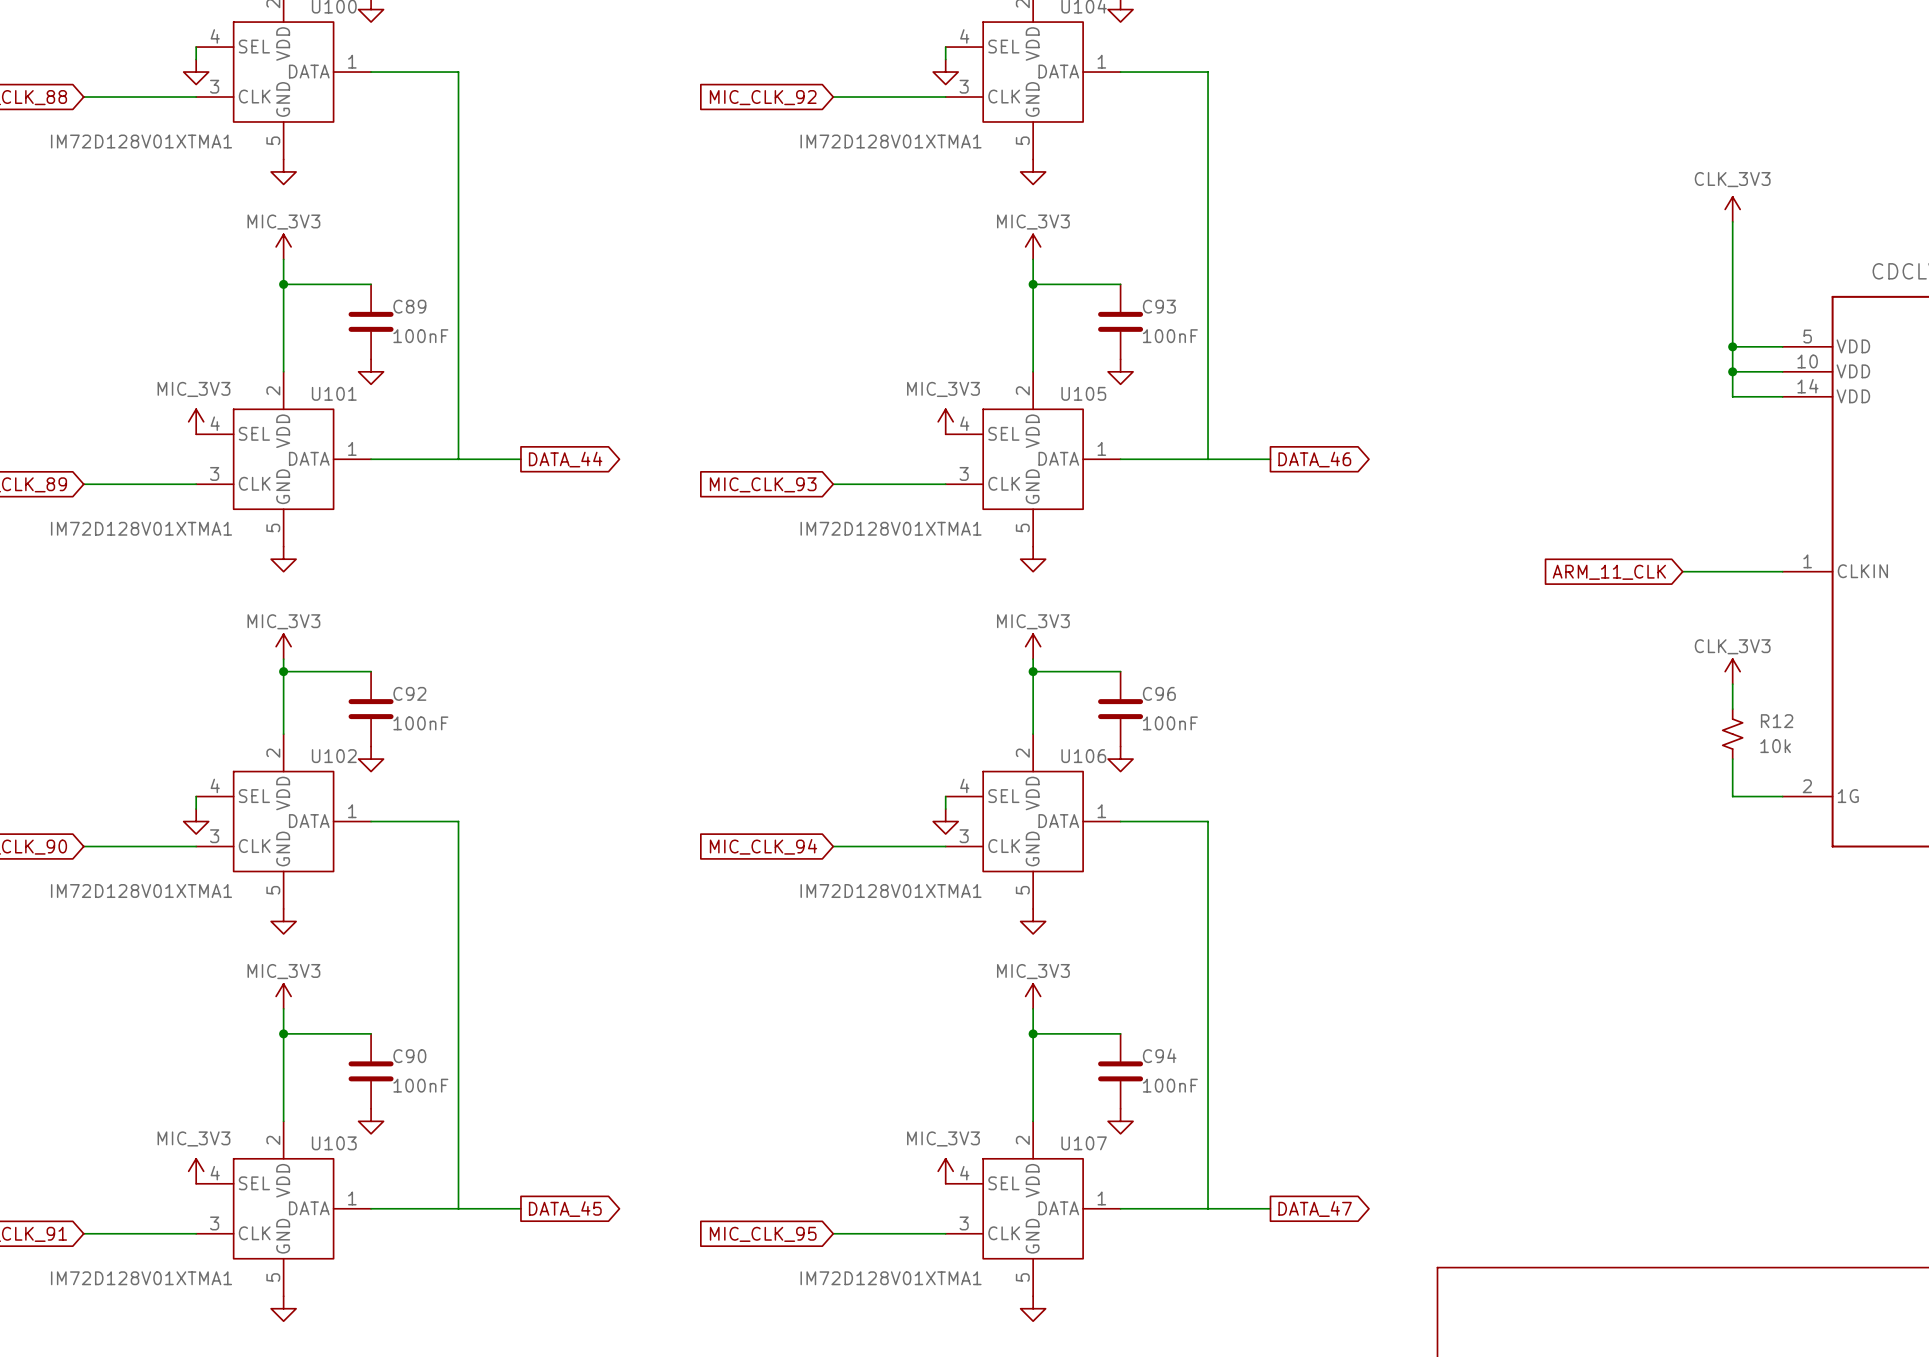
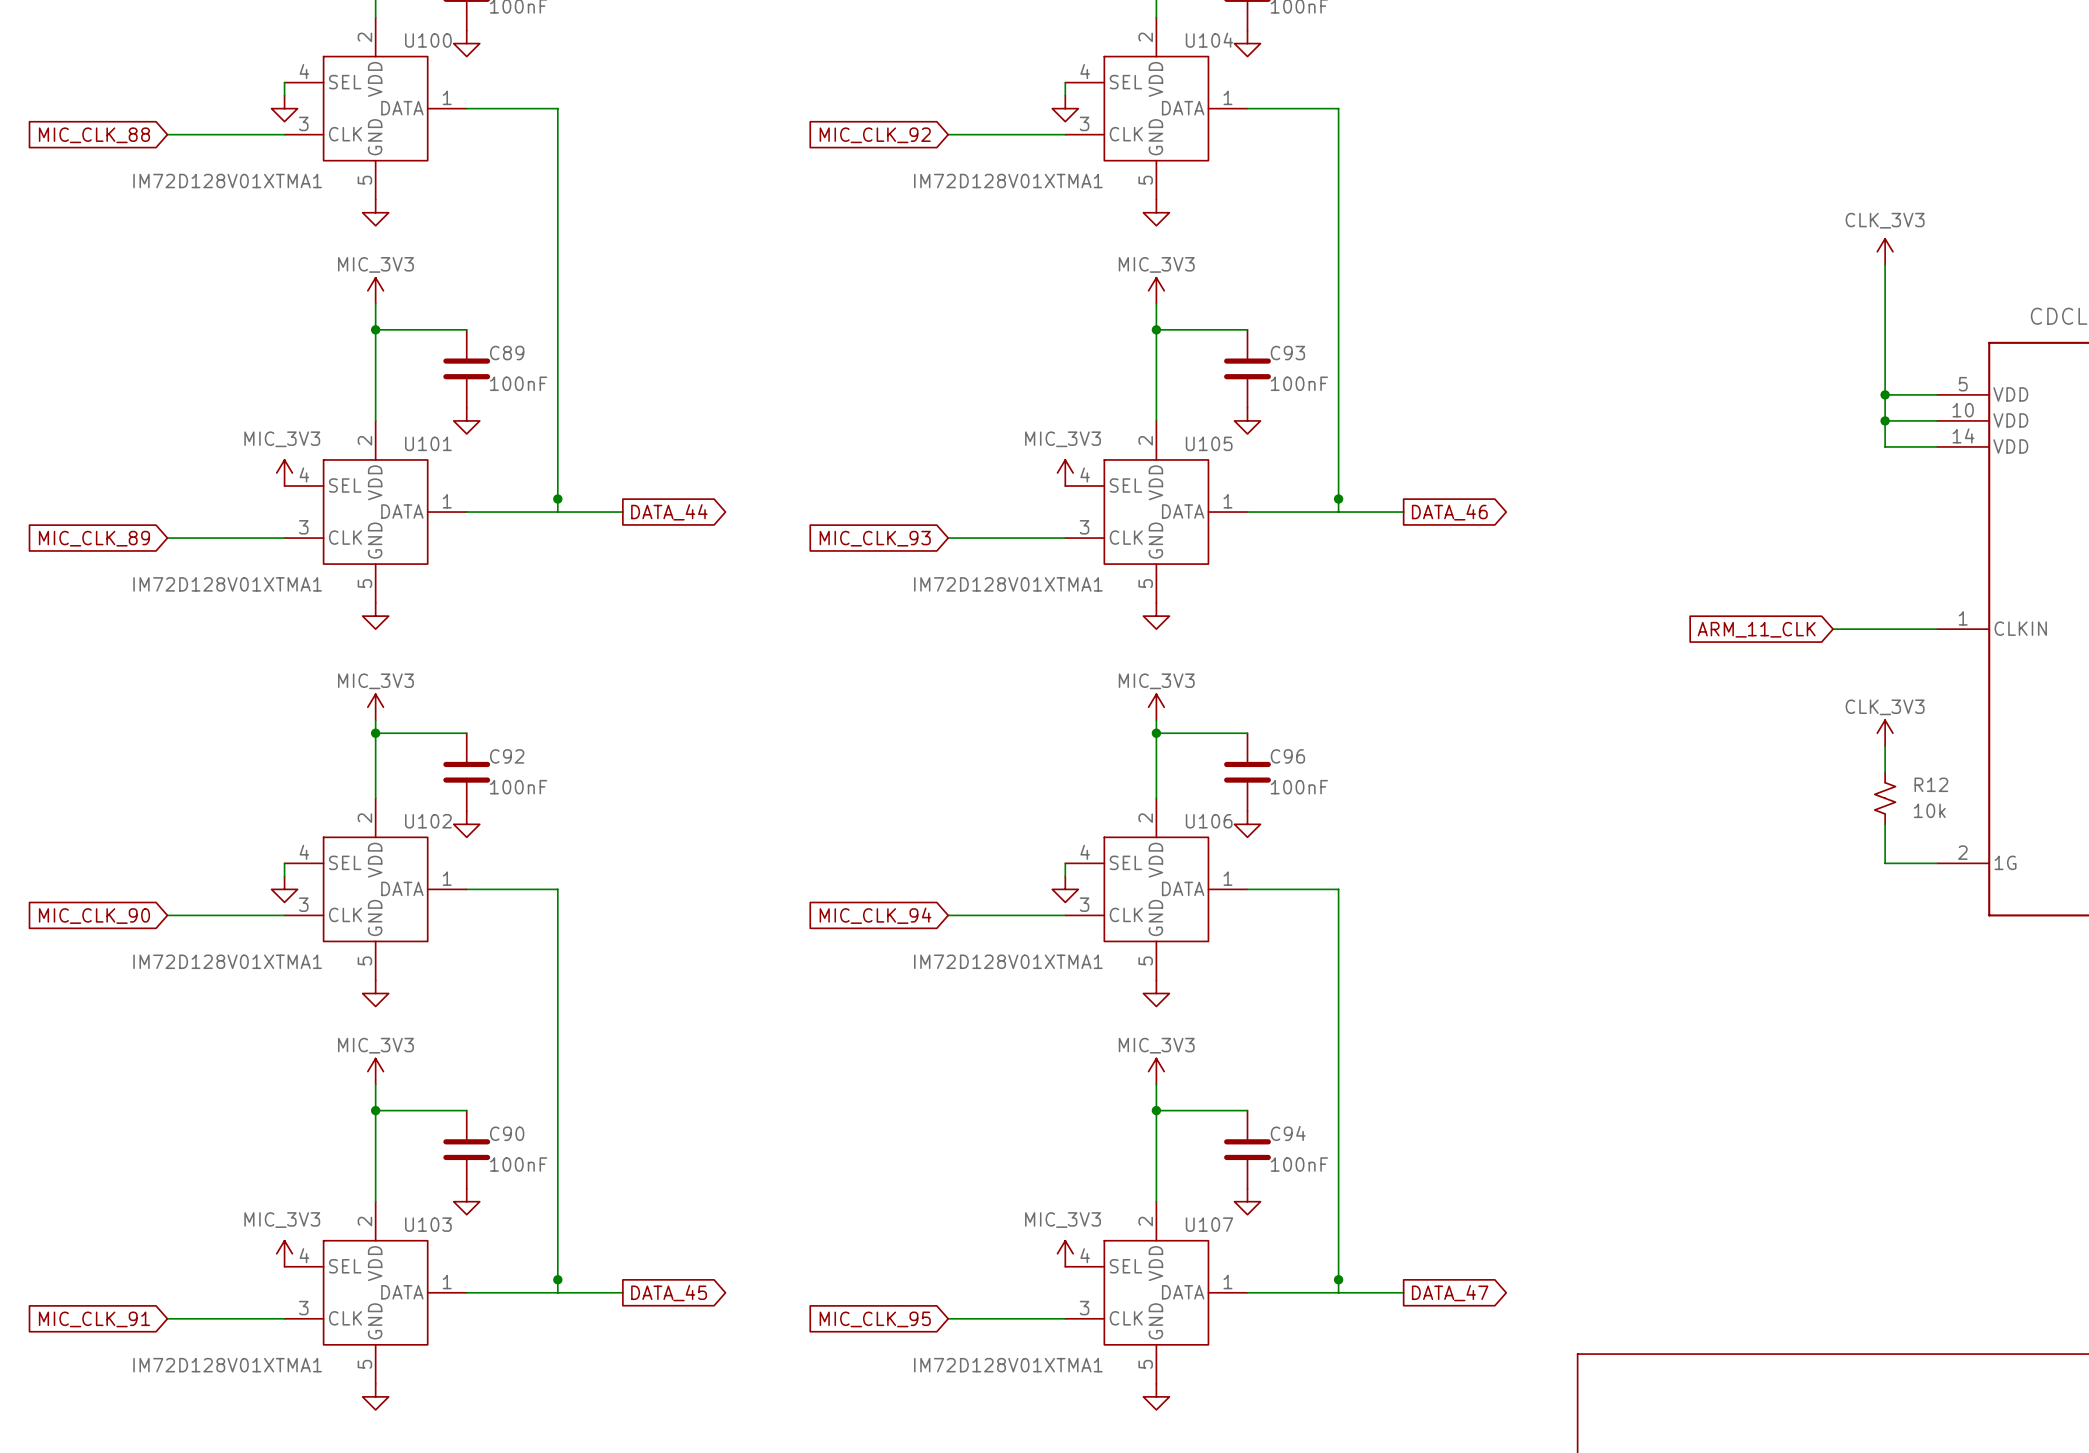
junction: none -> (557, 499)
junction: none -> (1338, 499)
junction: none -> (557, 1279)
junction: none -> (1338, 1279)

